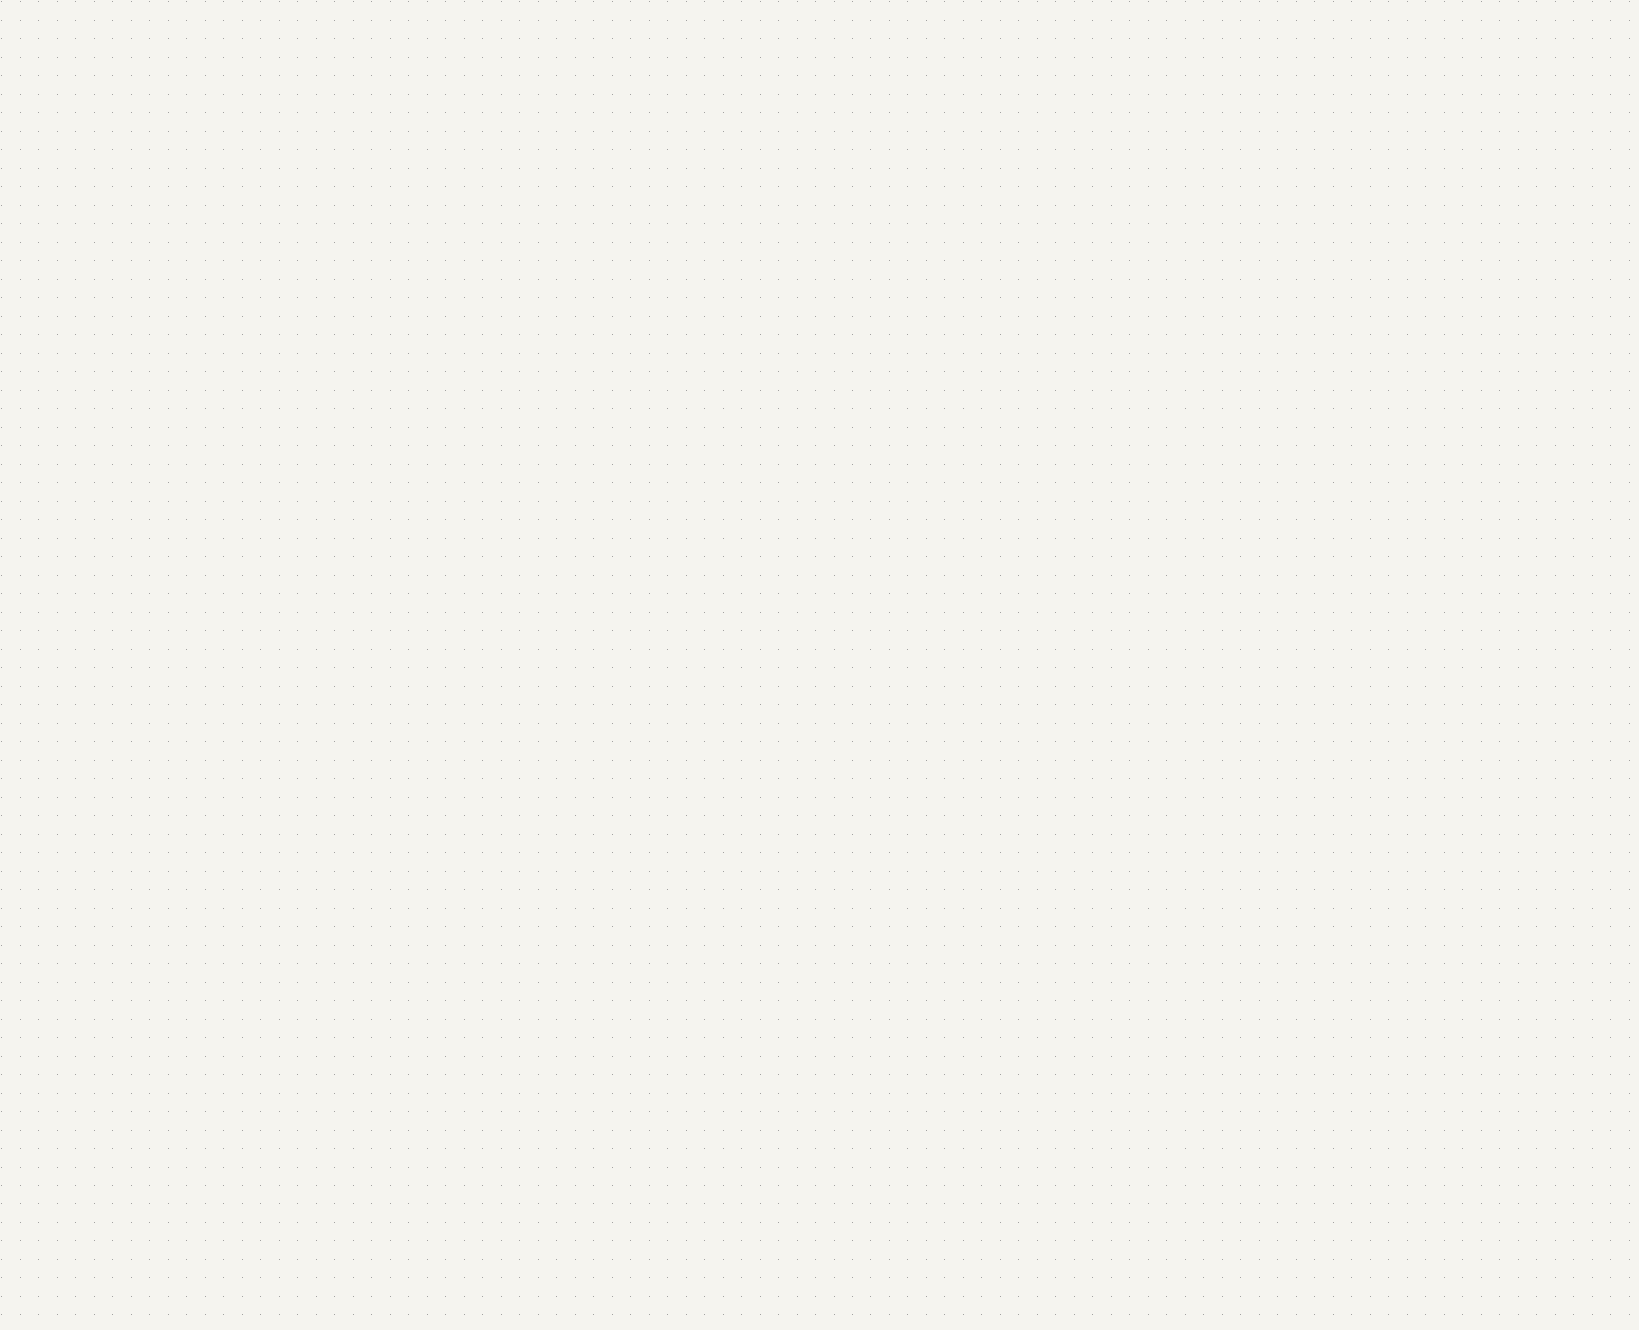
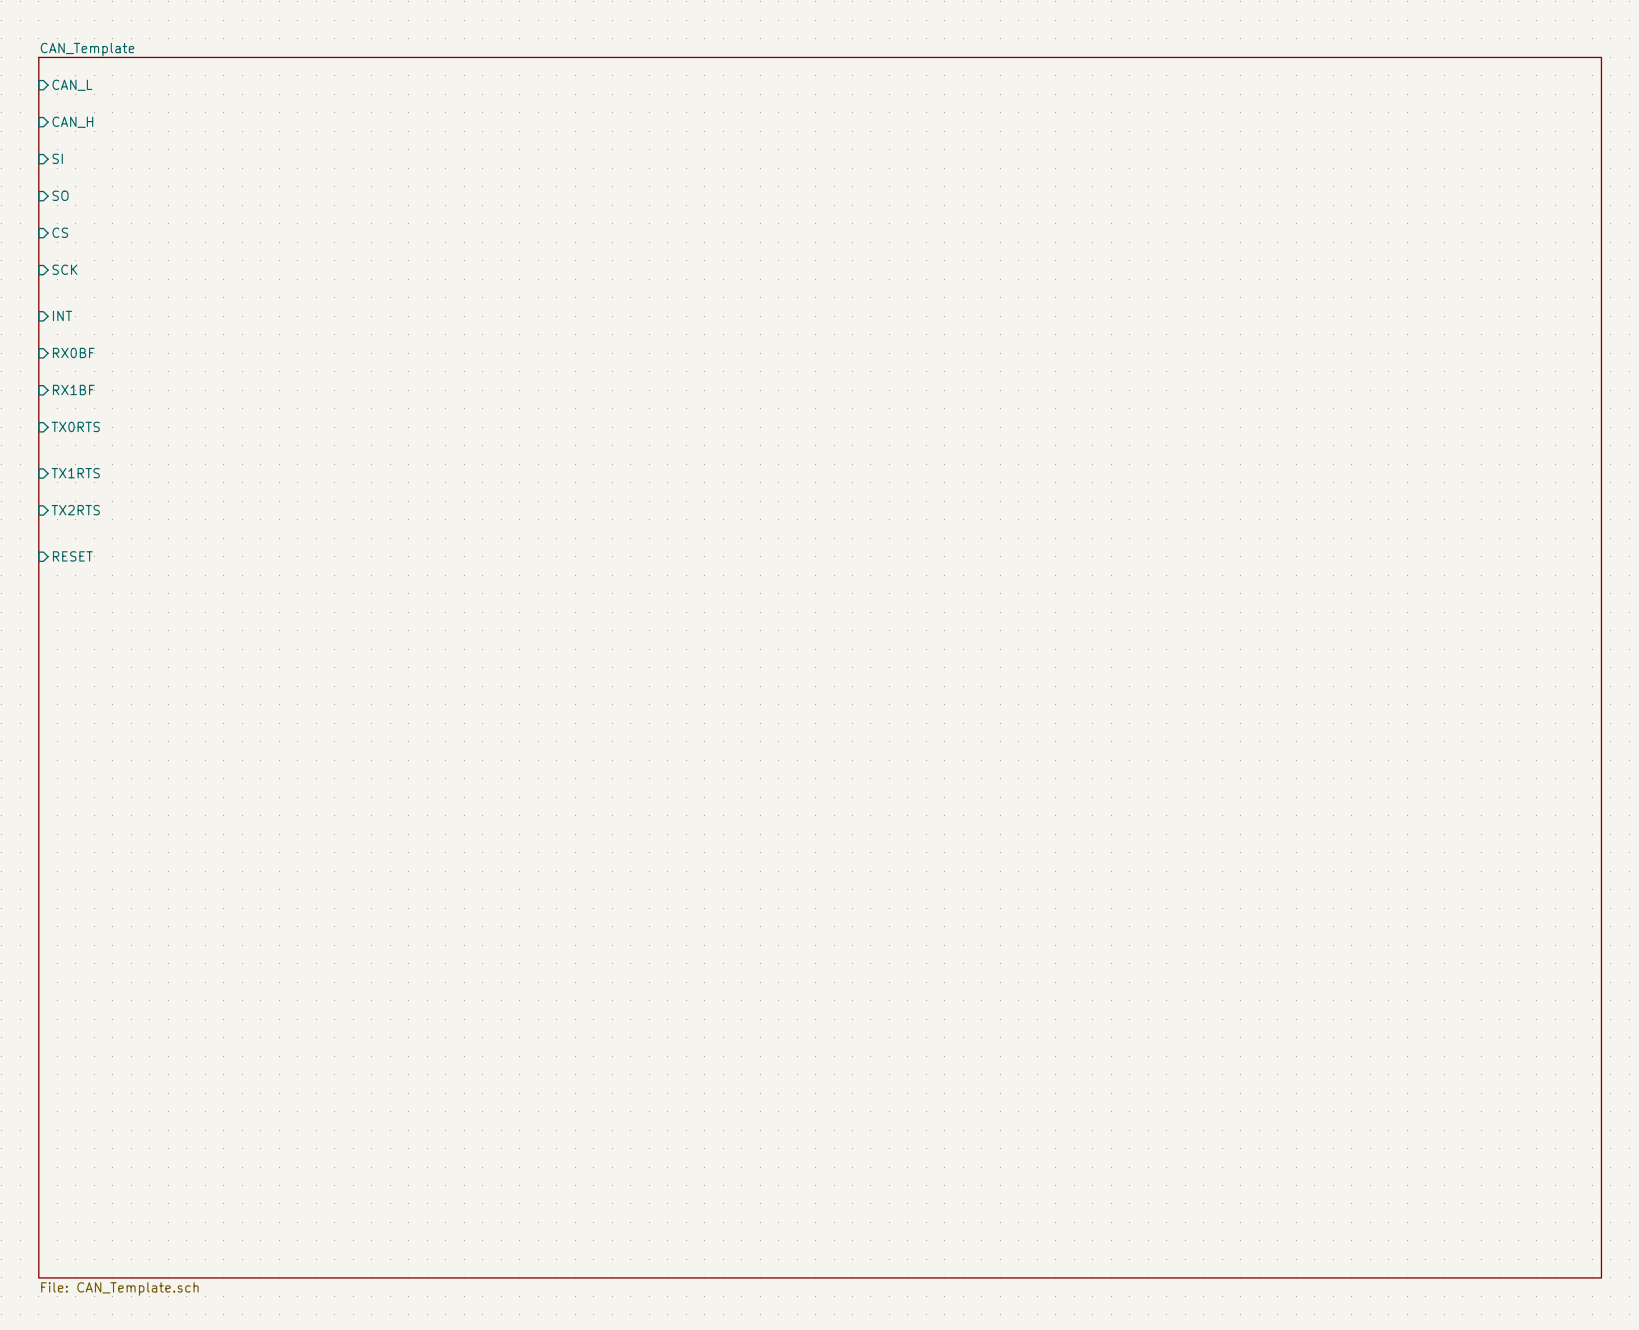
sheet pin: none -> CAN_L (72, 85)
sheet pin: none -> CAN_H (72, 122)
sheet pin: none -> SI (57, 158)
sheet pin: none -> SO (60, 195)
sheet pin: none -> CS (60, 232)
sheet pin: none -> SCK (64, 269)
sheet pin: none -> INT (62, 315)
sheet pin: none -> RX0BF (73, 352)
sheet pin: none -> RX1BF (73, 389)
sheet pin: none -> TX0RTS (75, 426)
sheet pin: none -> TX1RTS (75, 473)
sheet pin: none -> TX2RTS (75, 510)
sheet pin: none -> RESET (72, 556)
sheet CAN_Template: none -> File: CAN_Template.sch (820, 667)

